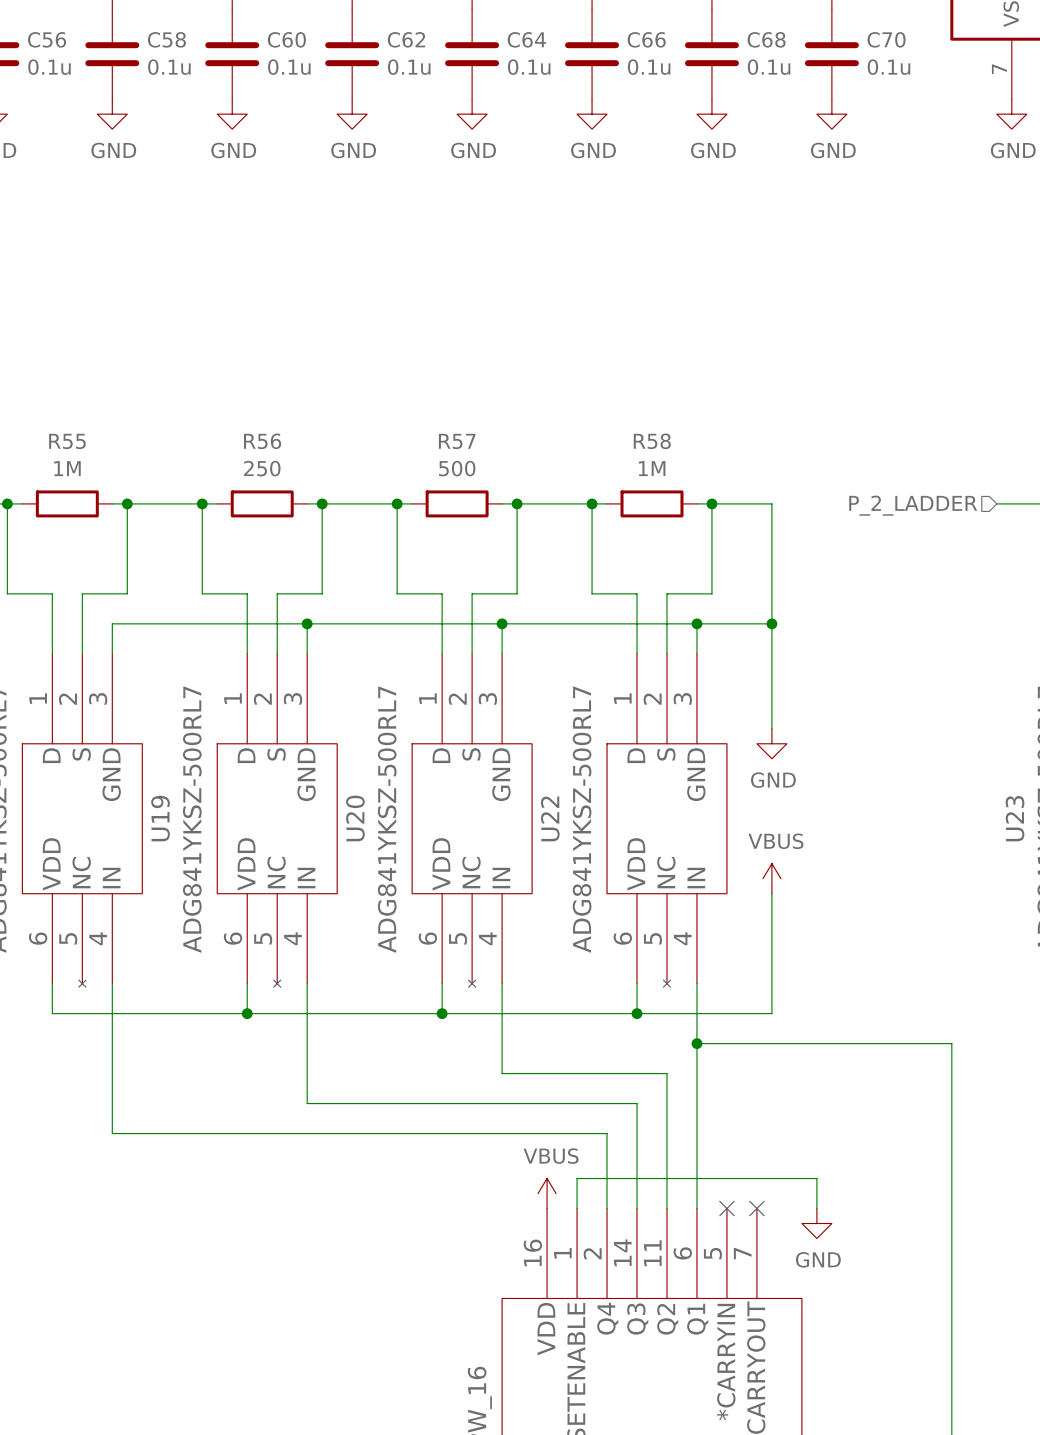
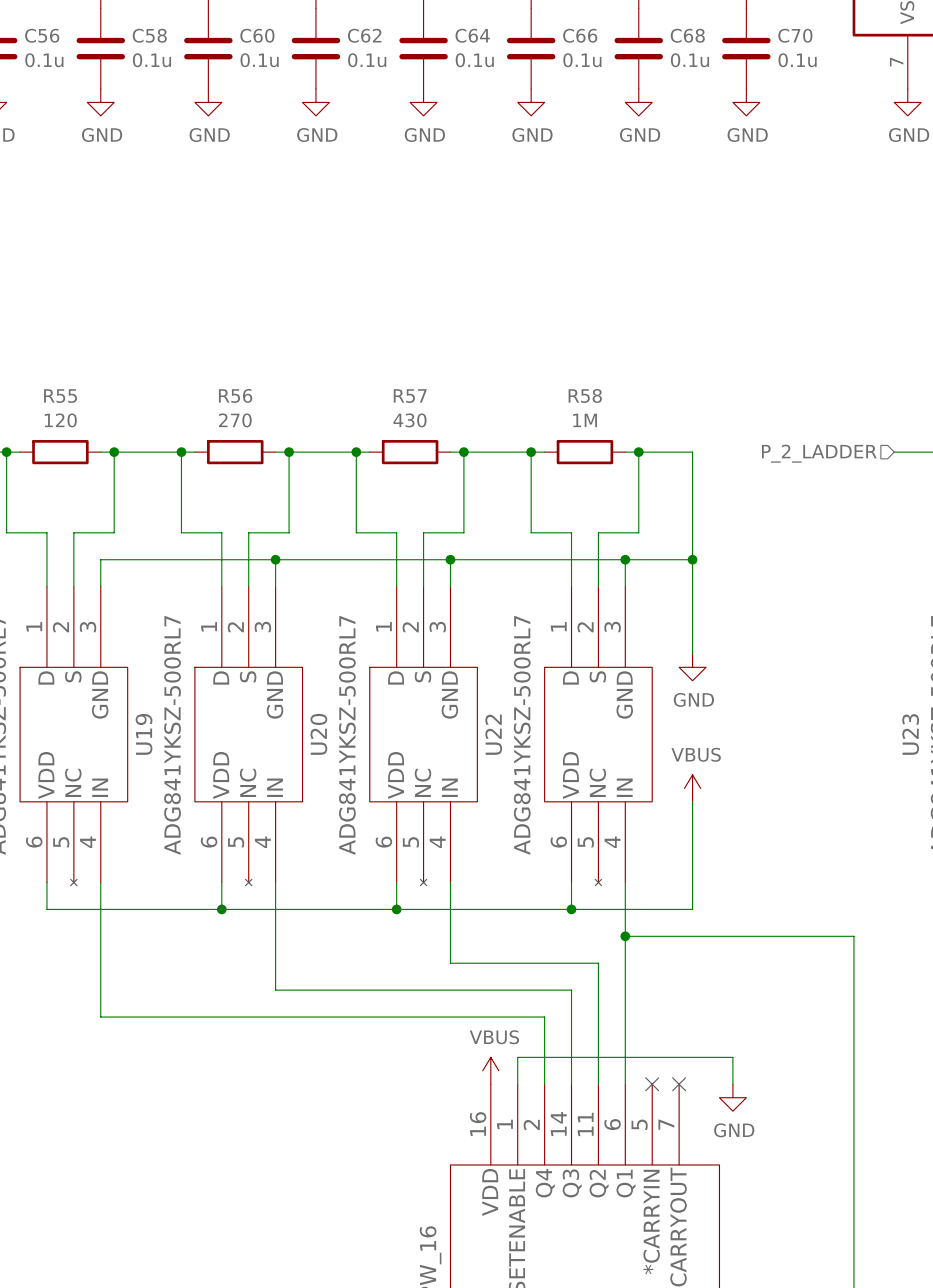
R55 value: 1M (67, 468) -> 120 (60, 420)
R56 value: 250 (262, 468) -> 270 (235, 420)
R57 value: 500 (457, 468) -> 430 (409, 420)

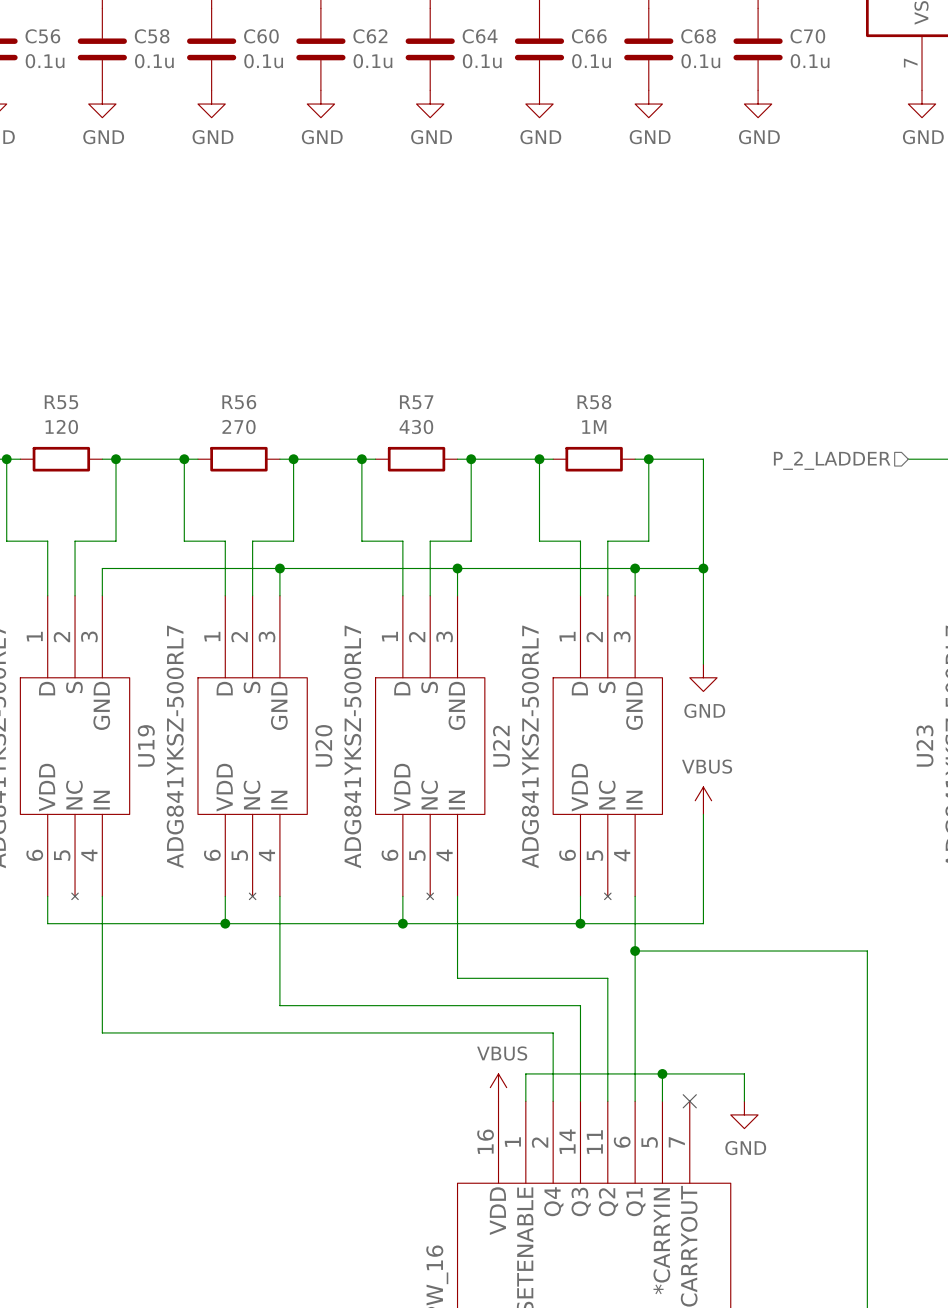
wire: none -> (662, 1073) (662, 1101)
junction: none -> (662, 1073)
no-connect mark: (652, 1084) -> none

